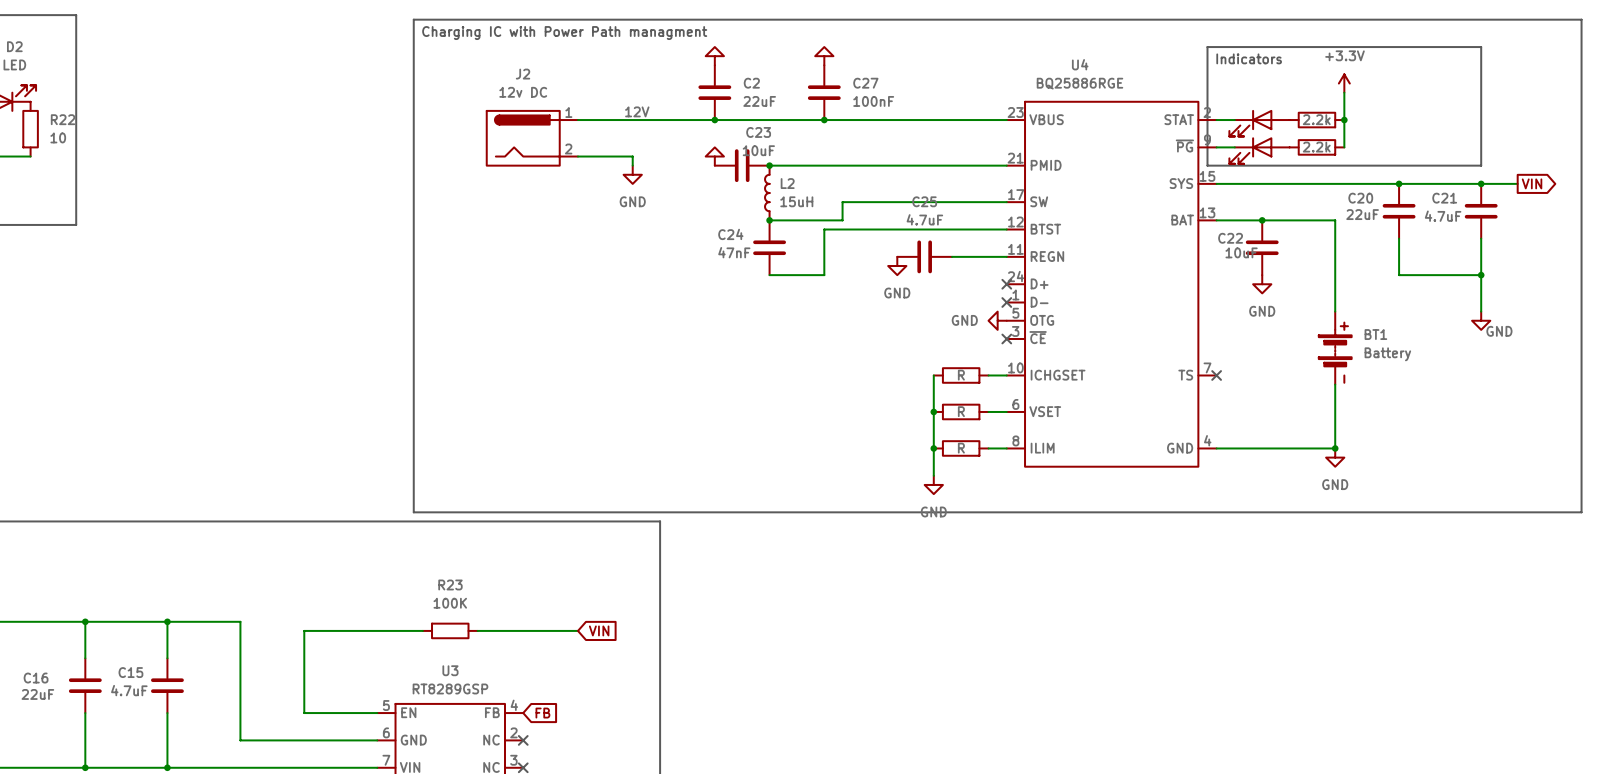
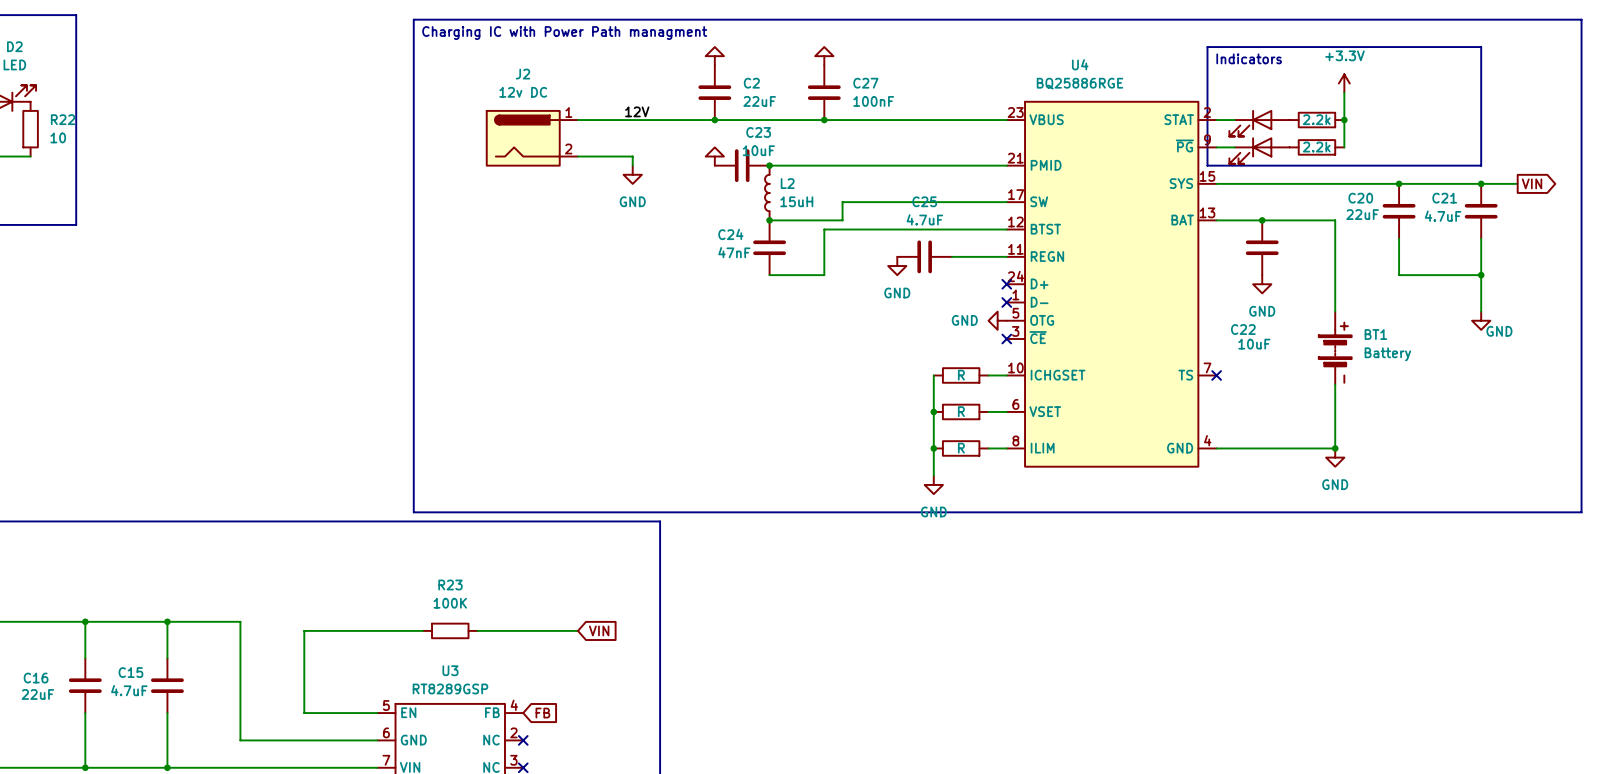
C22 name position: C22 (1230, 238) -> C22 (1243, 329)
C22 value position: 10uF (1241, 252) -> 10uF (1254, 344)

